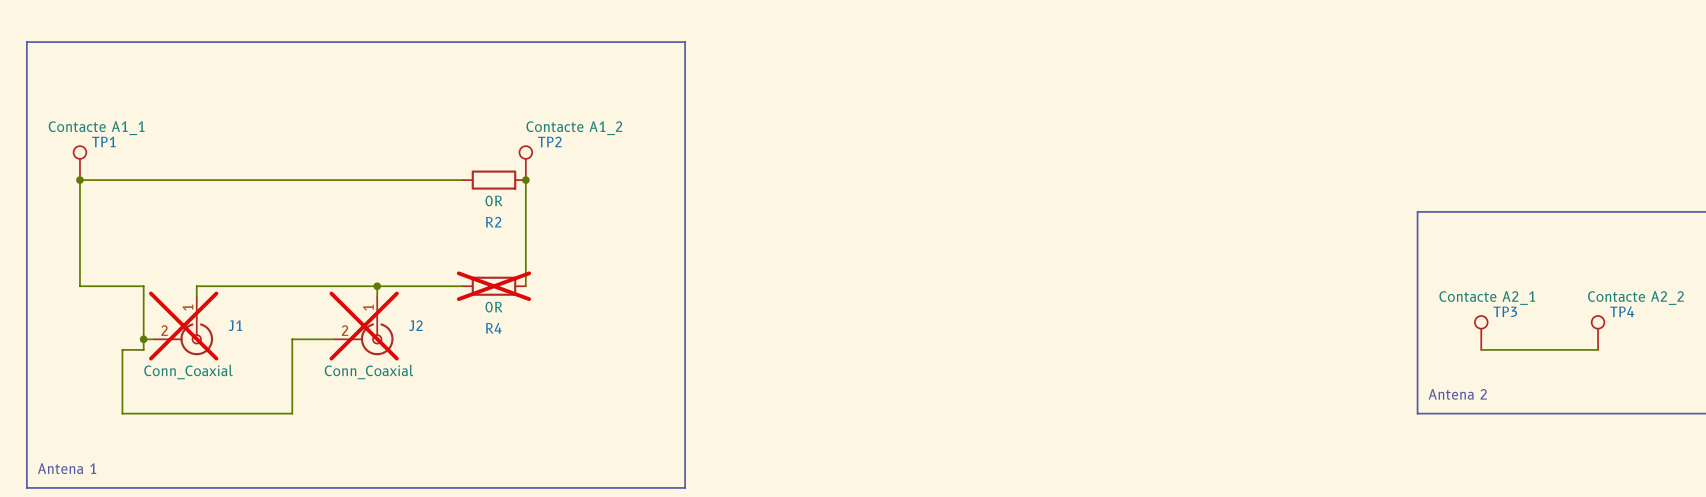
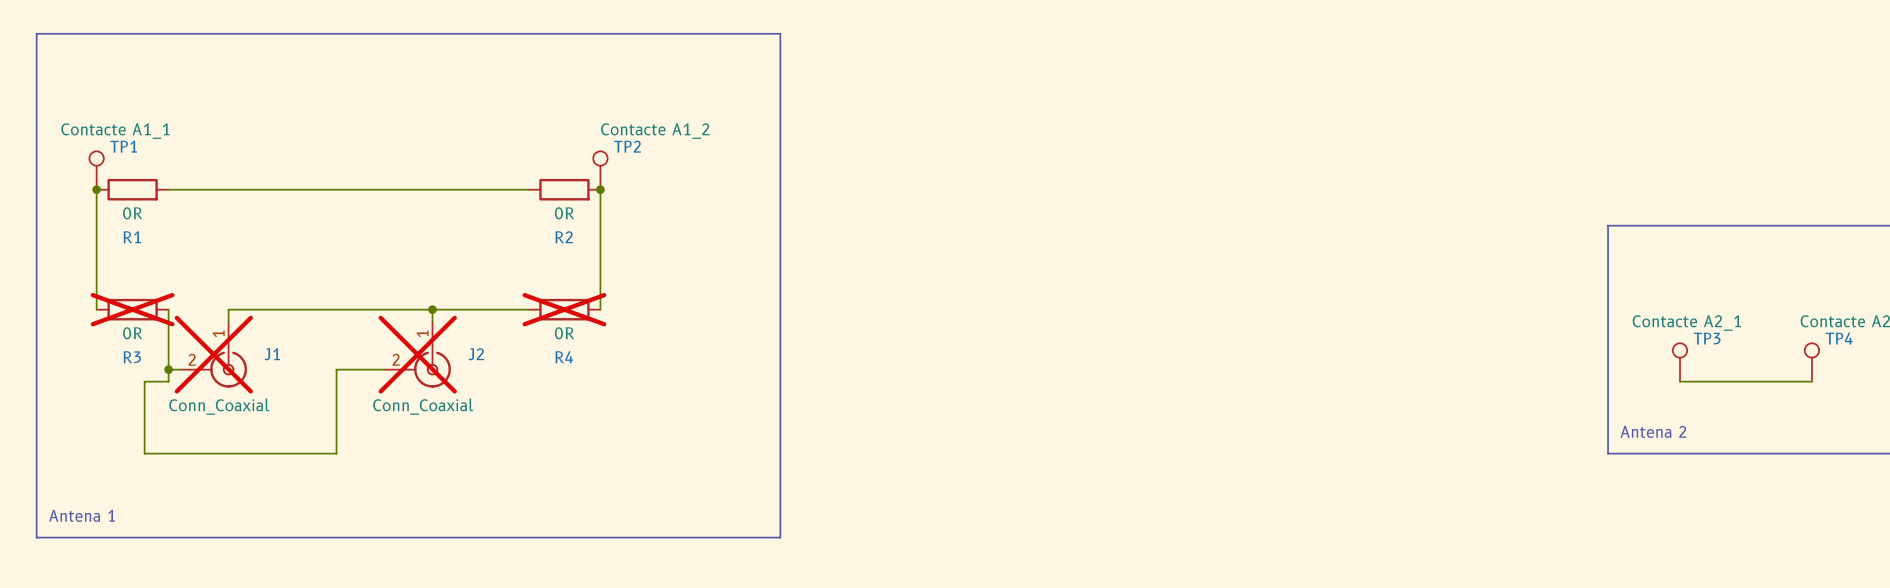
wire: (79, 180) (143, 180) -> none
R1: none -> 0R (132, 189)
R3: none -> 0R (132, 309)

